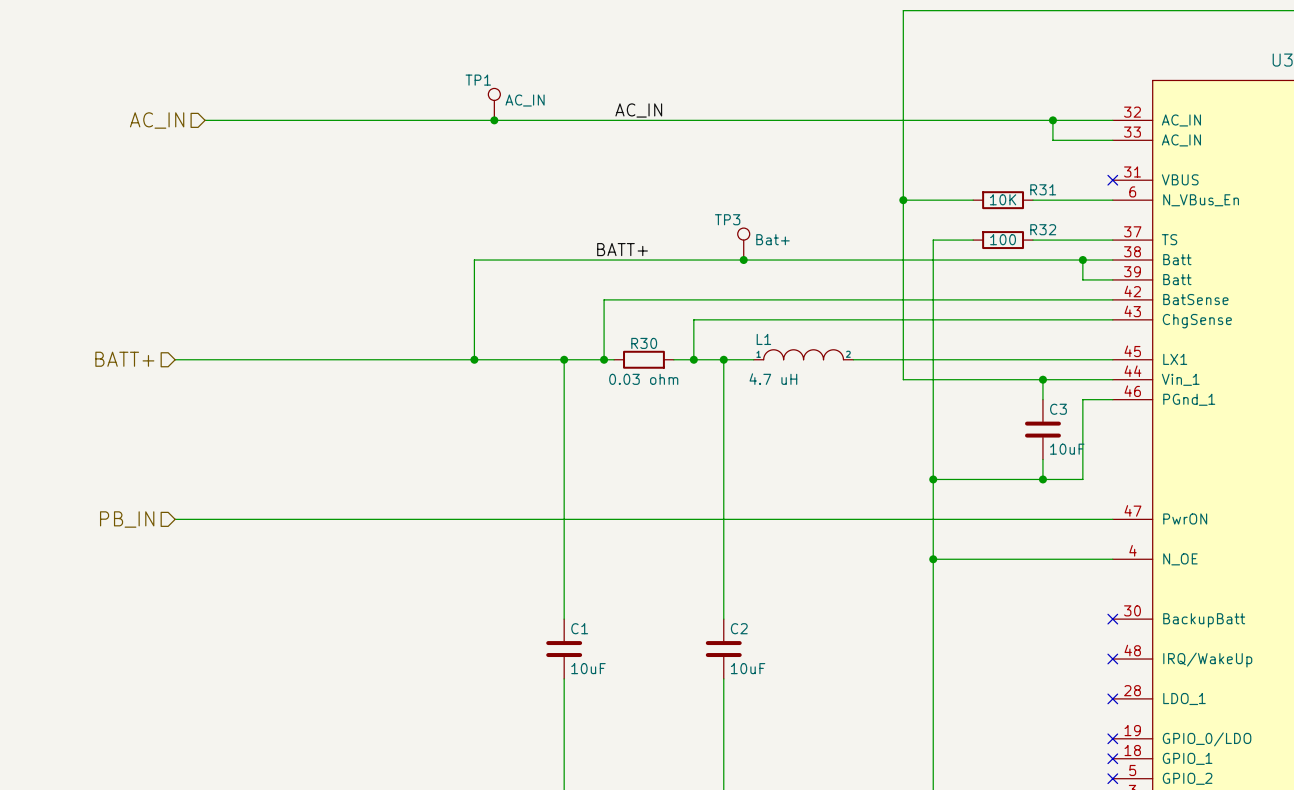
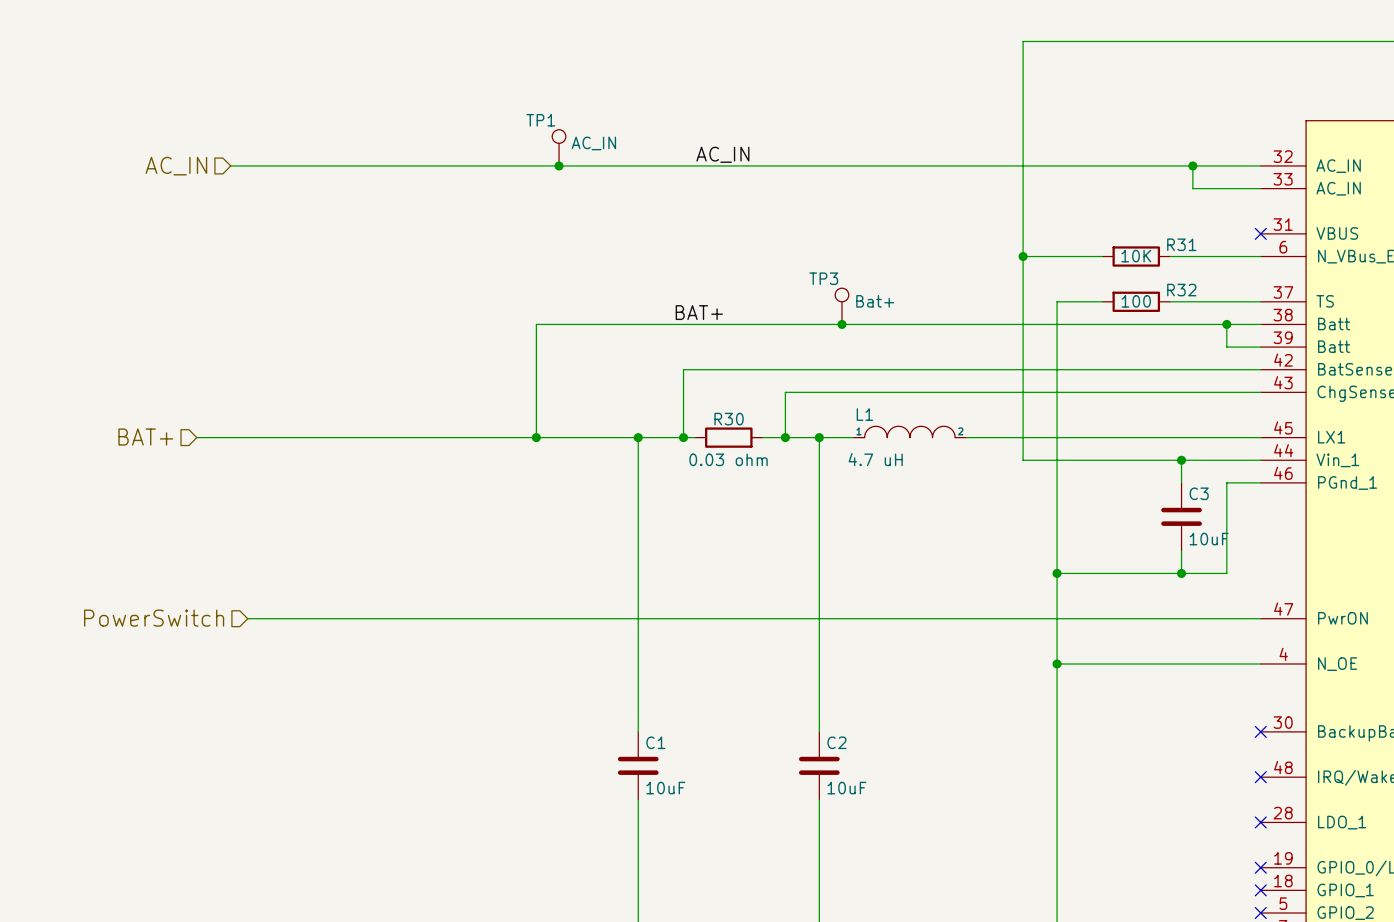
label: BATT+ (622, 249) -> BAT+ (699, 312)
hierarchical label: BATT+ (124, 359) -> BAT+ (145, 437)
hierarchical label: none -> PowerSwitch (154, 618)
hierarchical label: PB_IN (127, 519) -> none
wire: (175, 519) (220, 519) -> none

